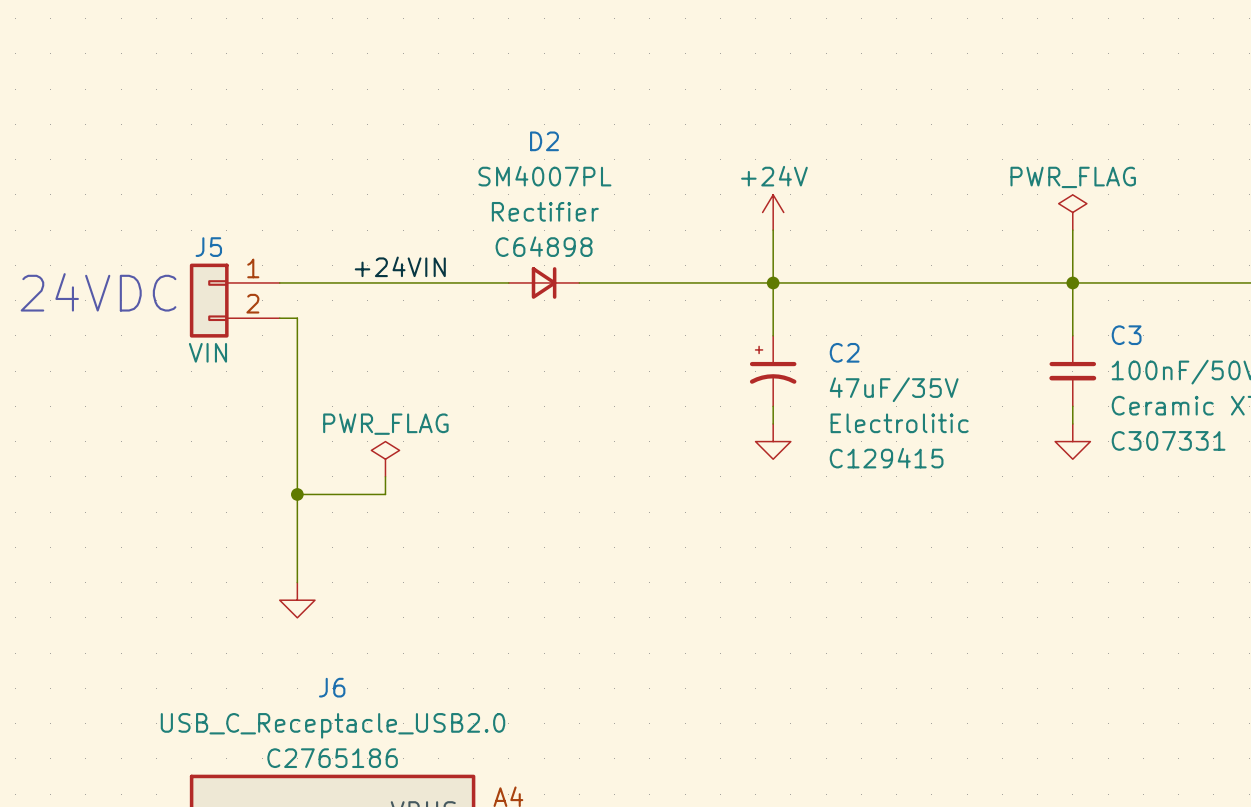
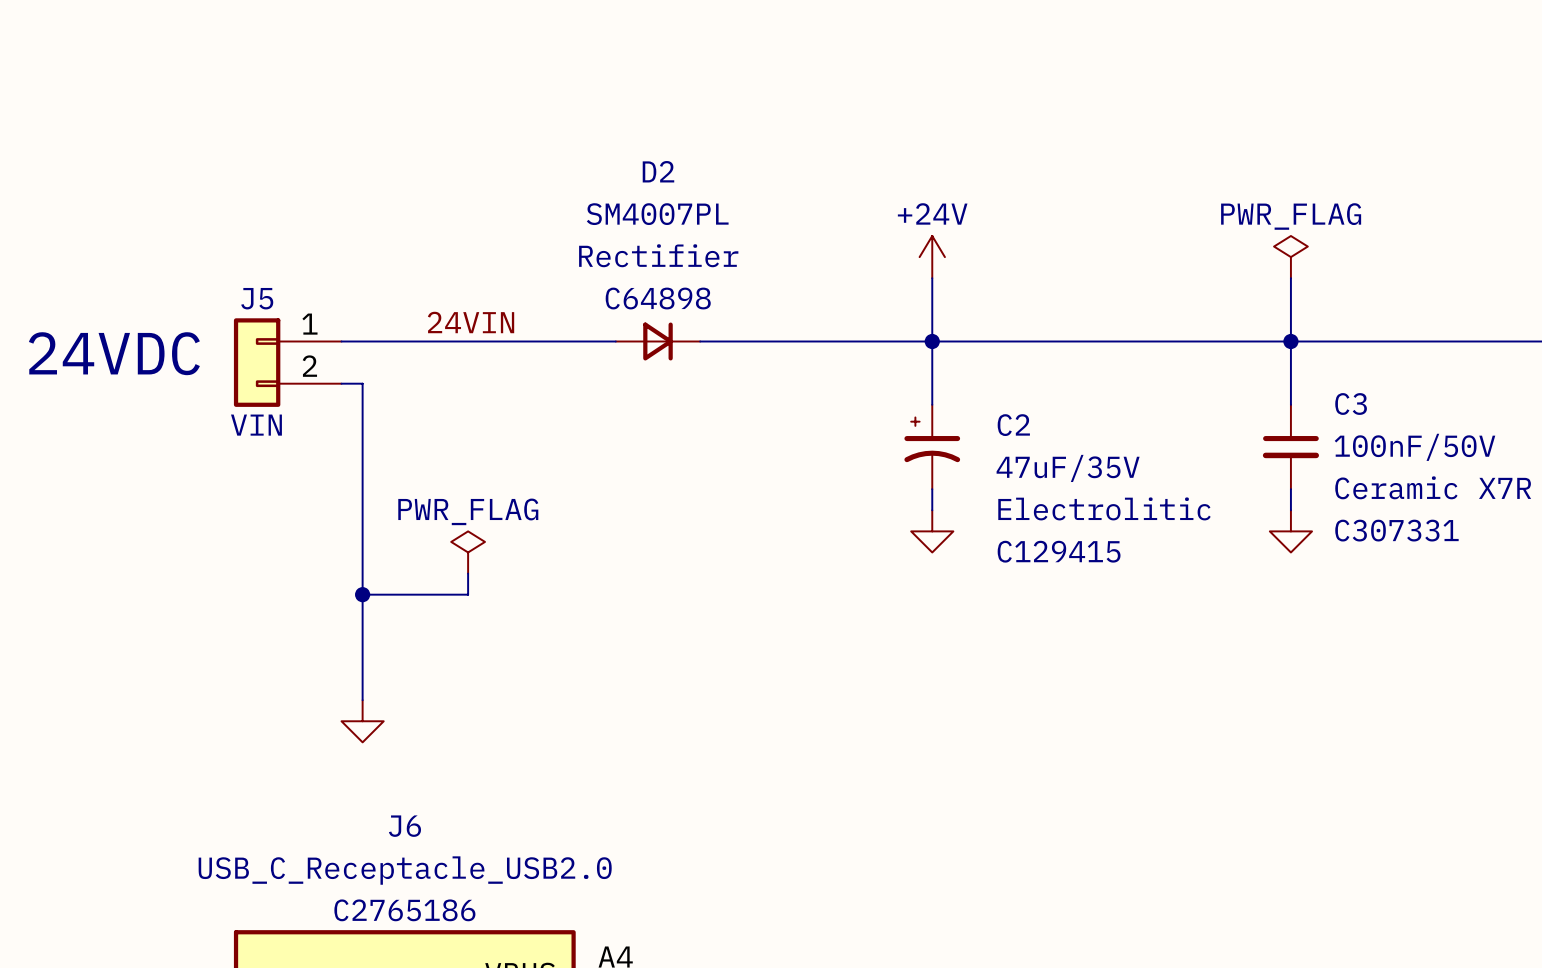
label: +24VIN (400, 266) -> 24VIN (471, 322)

